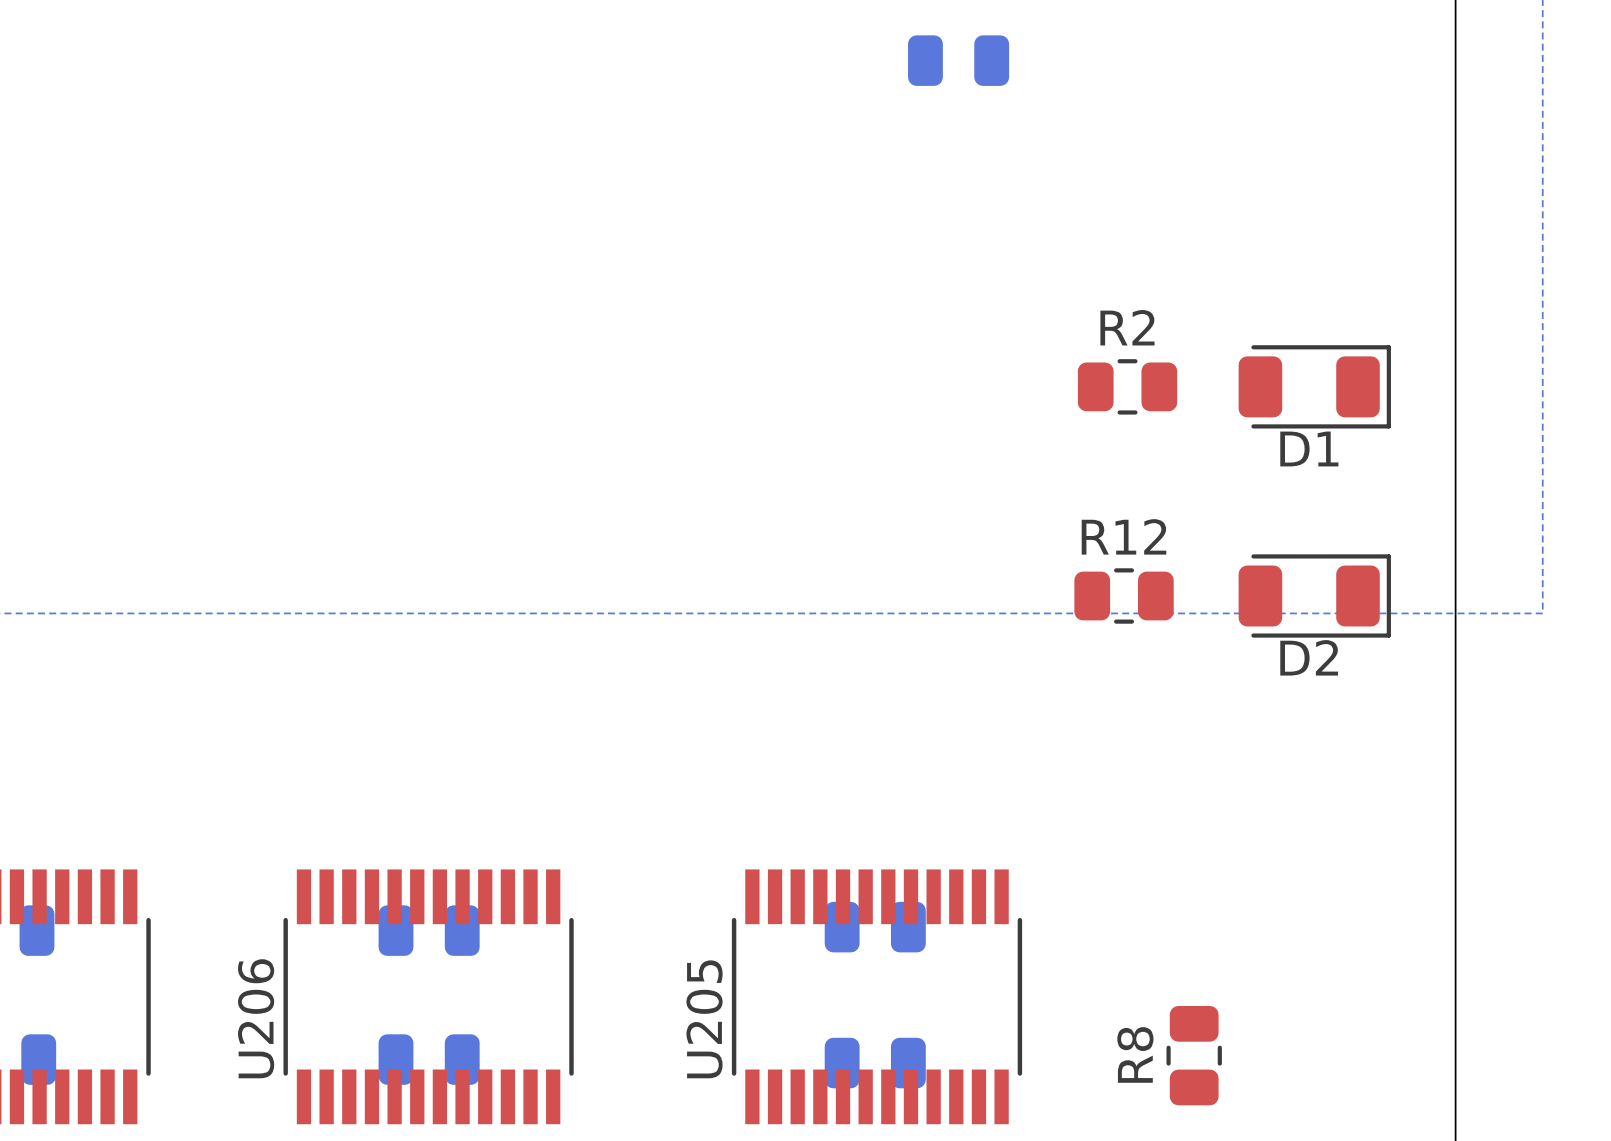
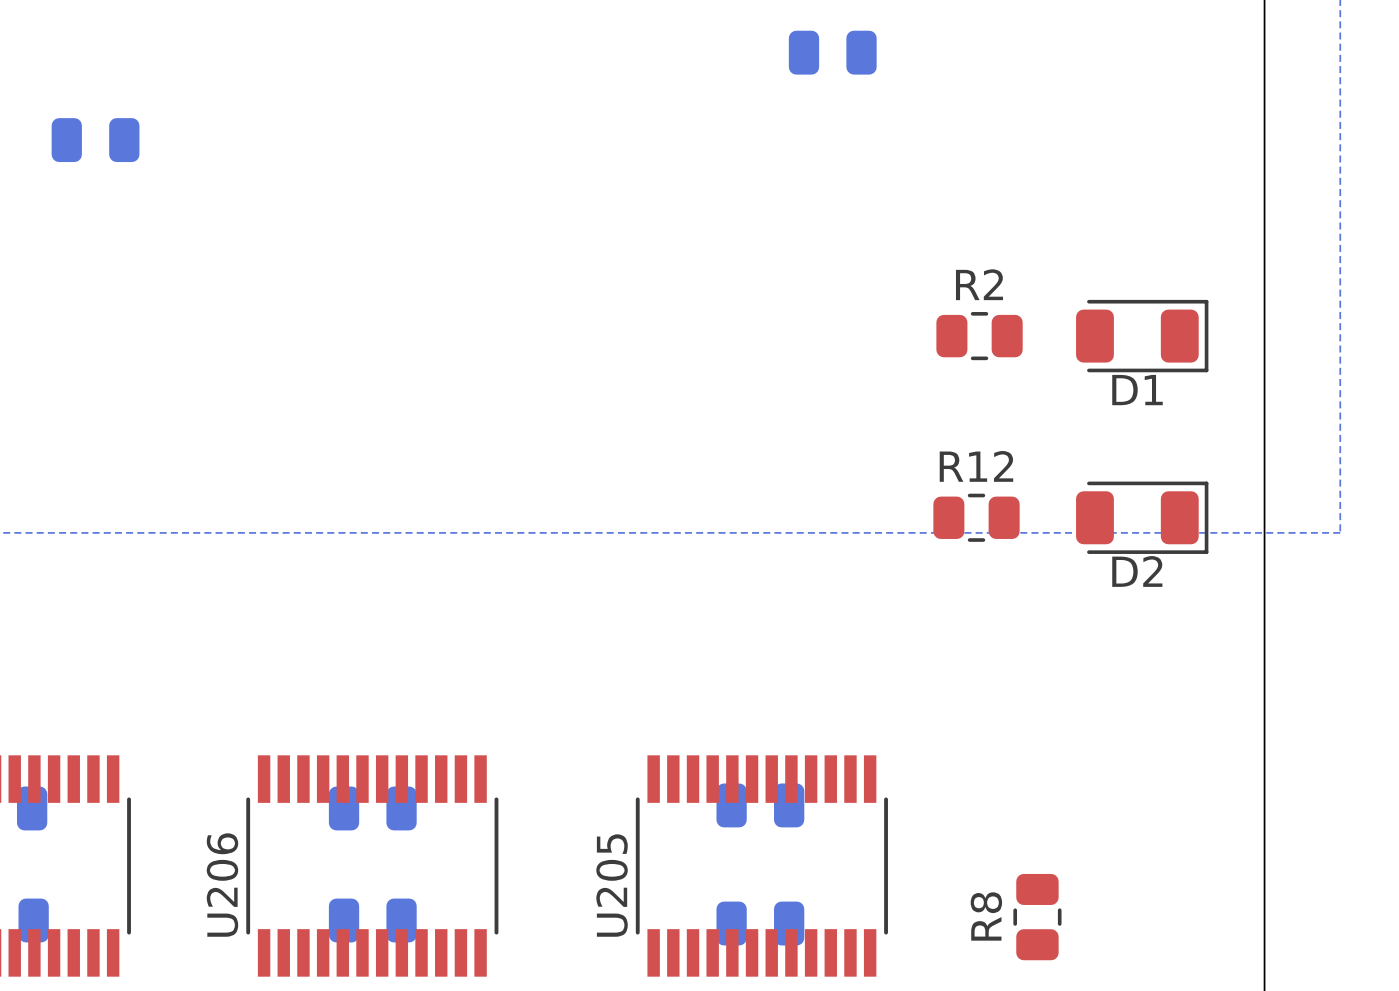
part: none -> (95, 140)

